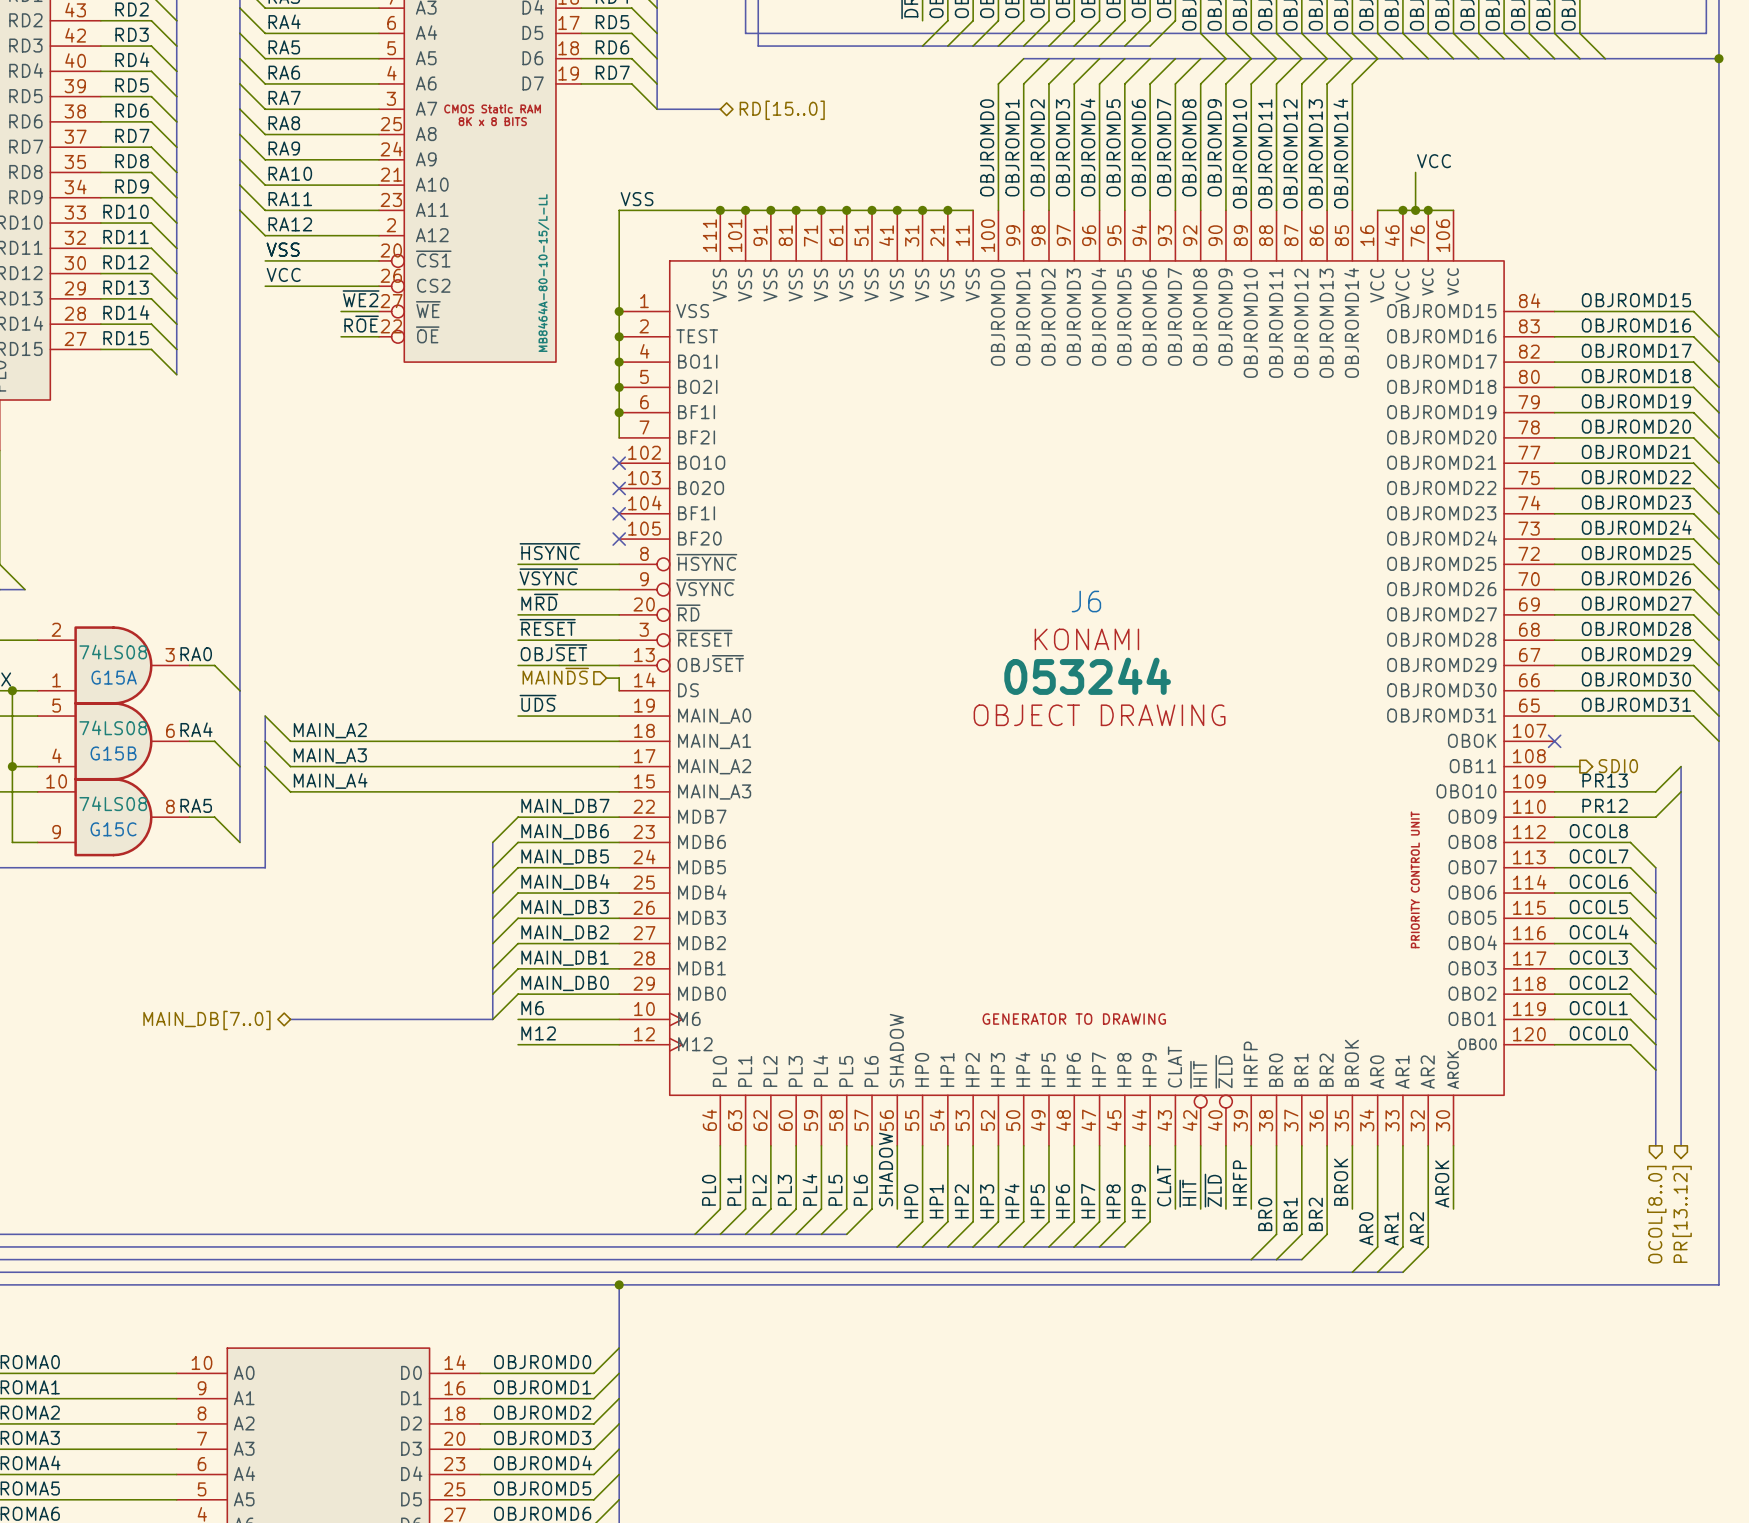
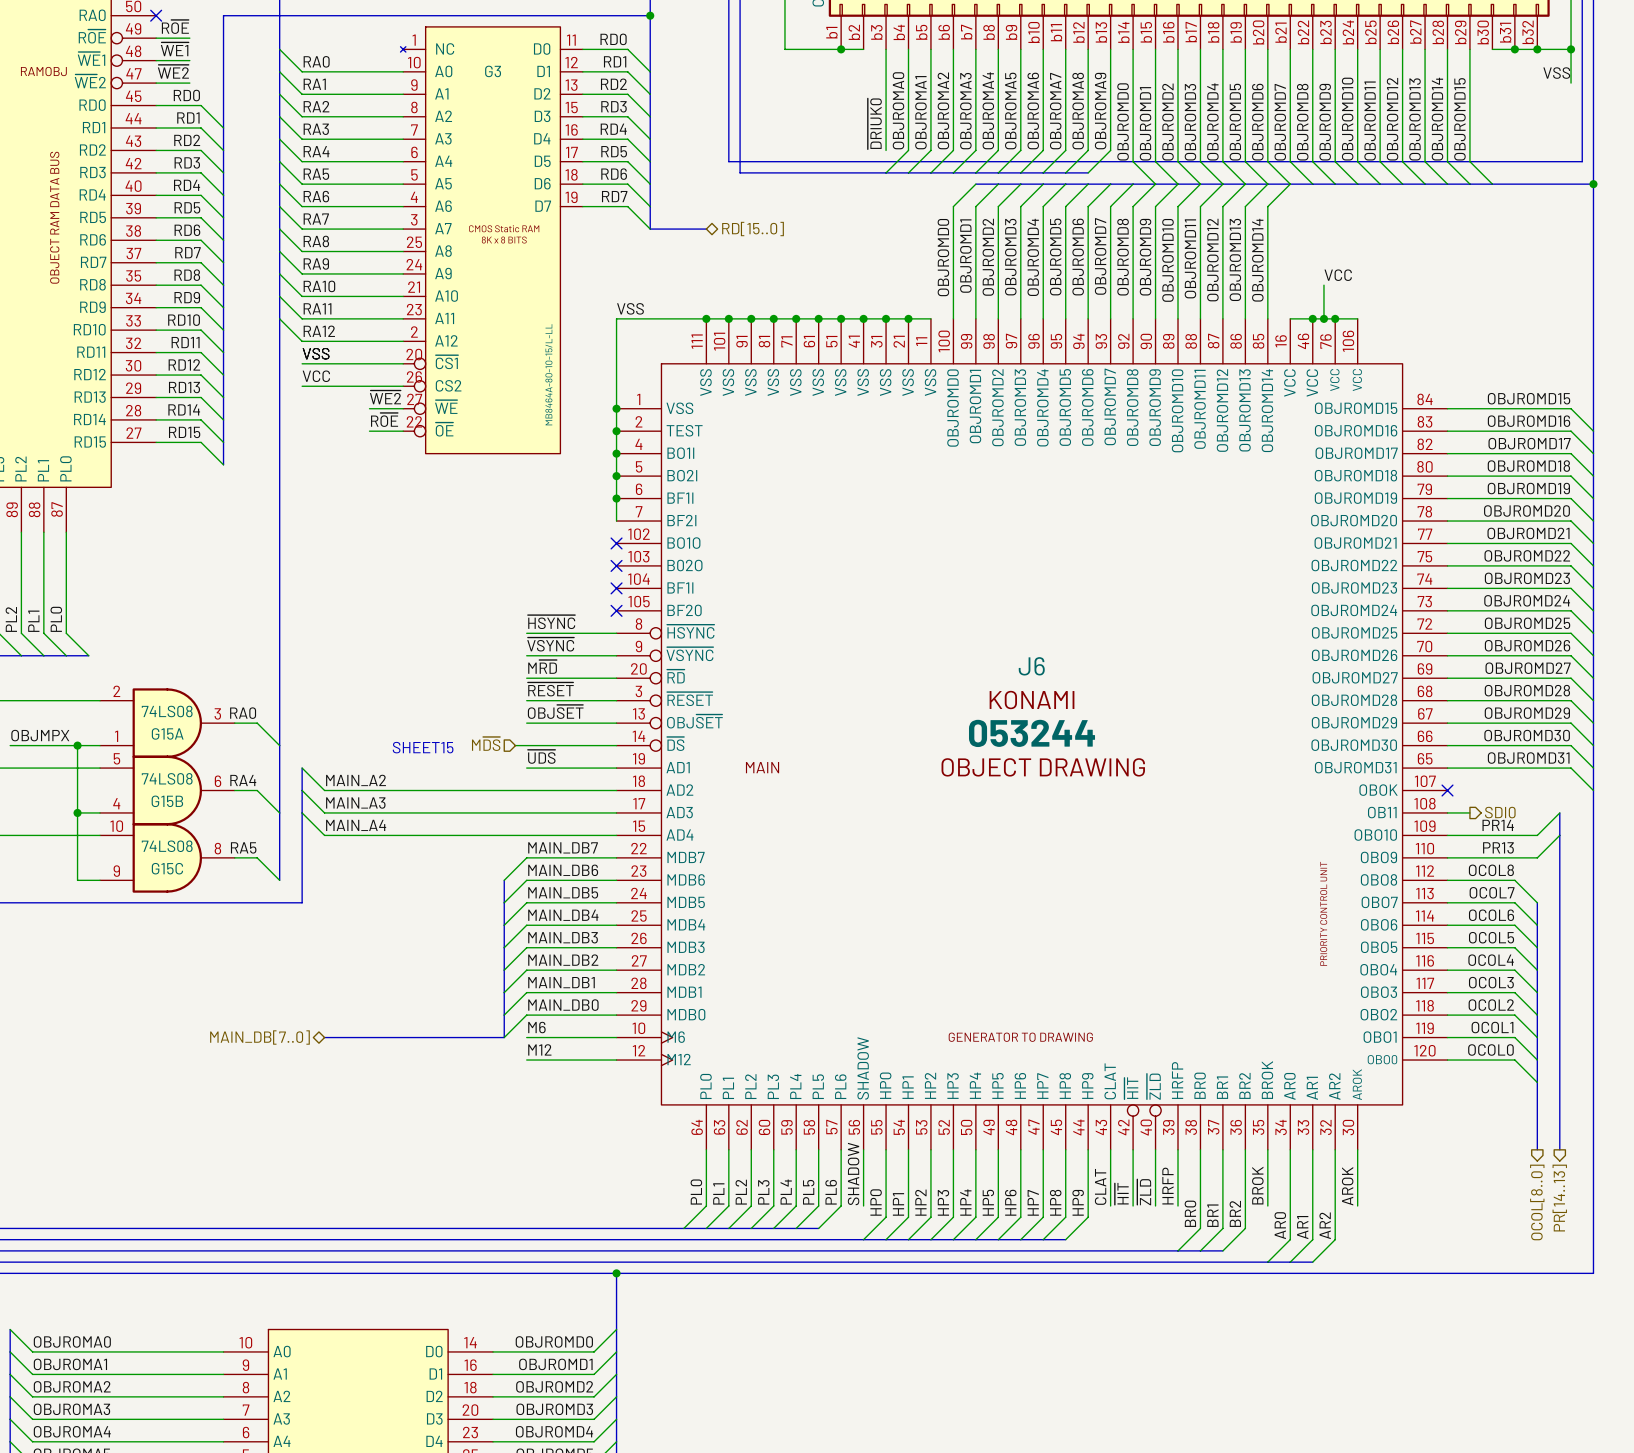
J6 symbol: [619, 210, 1555, 1146] -> [616, 318, 1448, 1150]
hierarchical label: MAIN~{DS} (555, 676) -> M~{DS} (486, 743)
wire: (606, 678) (619, 678) (619, 690) -> (515, 745) (616, 745)
text: none -> SHEET15 (423, 747)
label: PR13 (1605, 780) -> PR14 (1498, 825)
label: PR12 (1605, 805) -> PR13 (1498, 847)
hierarchical label: PR[13..12] (1682, 1214) -> PR[14..13] (1559, 1198)

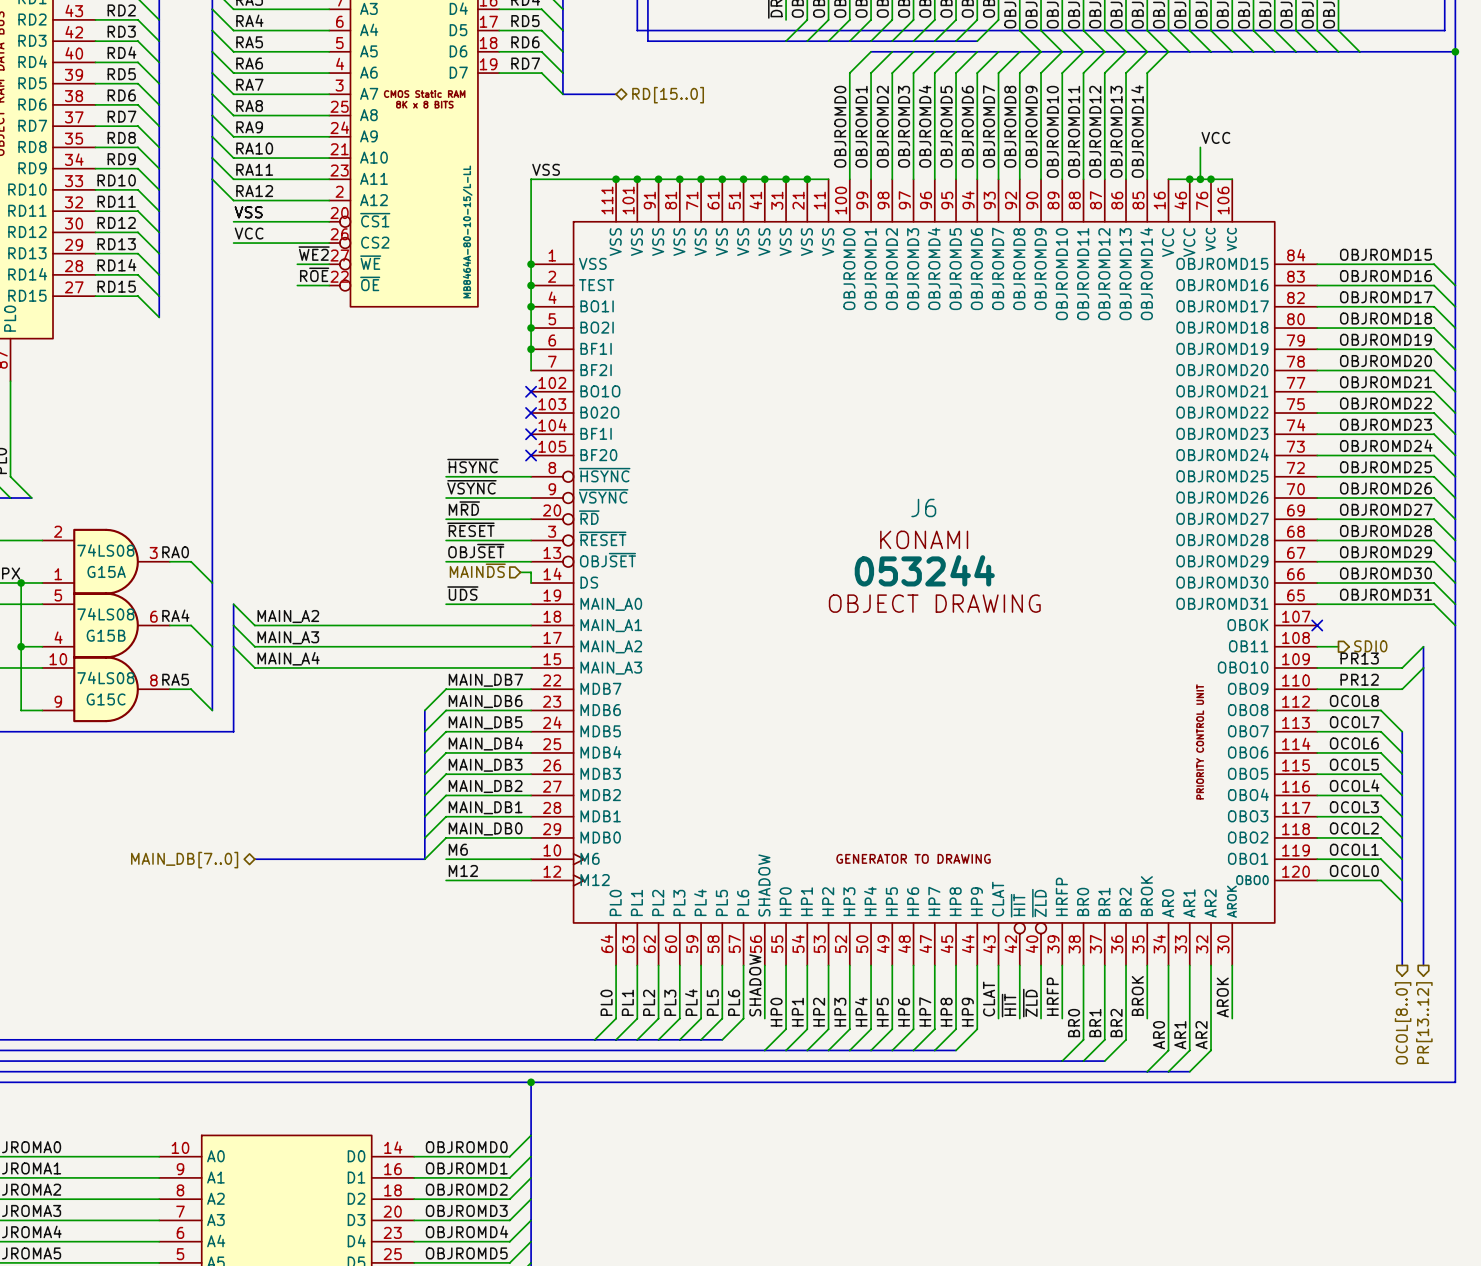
J6 symbol: [616, 318, 1448, 1150] -> [531, 179, 1318, 966]
hierarchical label: M~{DS} (486, 743) -> MAIN~{DS} (477, 570)
wire: (515, 745) (616, 745) -> (520, 572) (531, 572) (531, 582)
text: SHEET15 (423, 747) -> none
label: PR14 (1498, 825) -> PR13 (1359, 658)
label: PR13 (1498, 847) -> PR12 (1359, 679)
hierarchical label: PR[14..13] (1559, 1198) -> PR[13..12] (1424, 1023)

